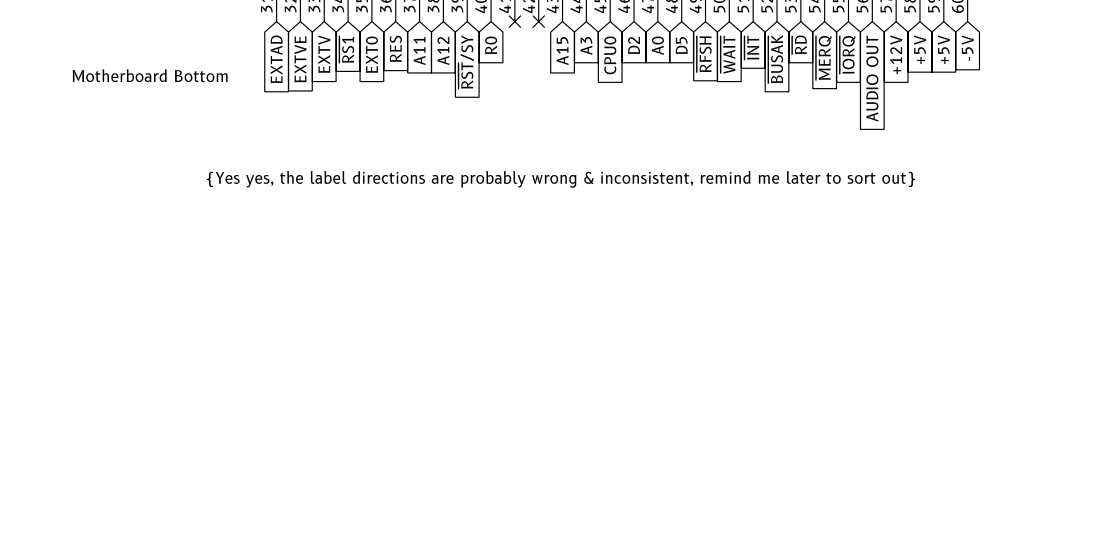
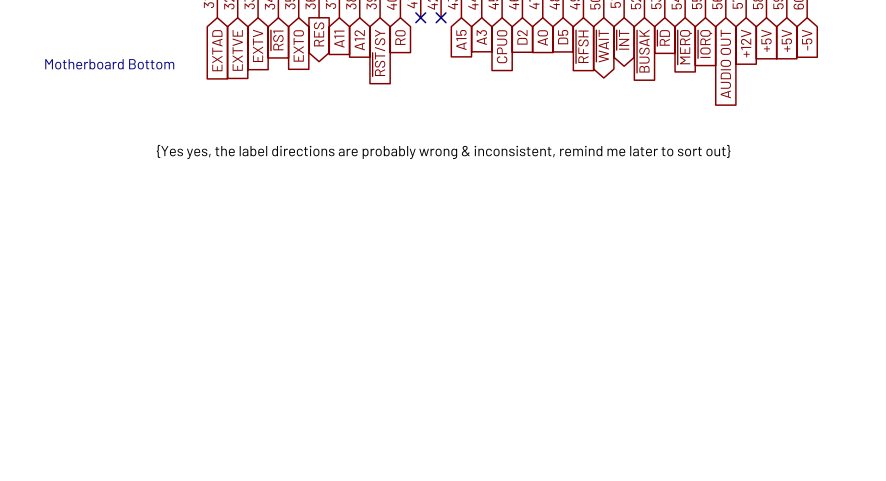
global label shape: input (751, 47) -> bidirectional (622, 39)
global label shape: input (395, 48) -> output (319, 34)
global label shape: input (727, 54) -> bidirectional (602, 46)

